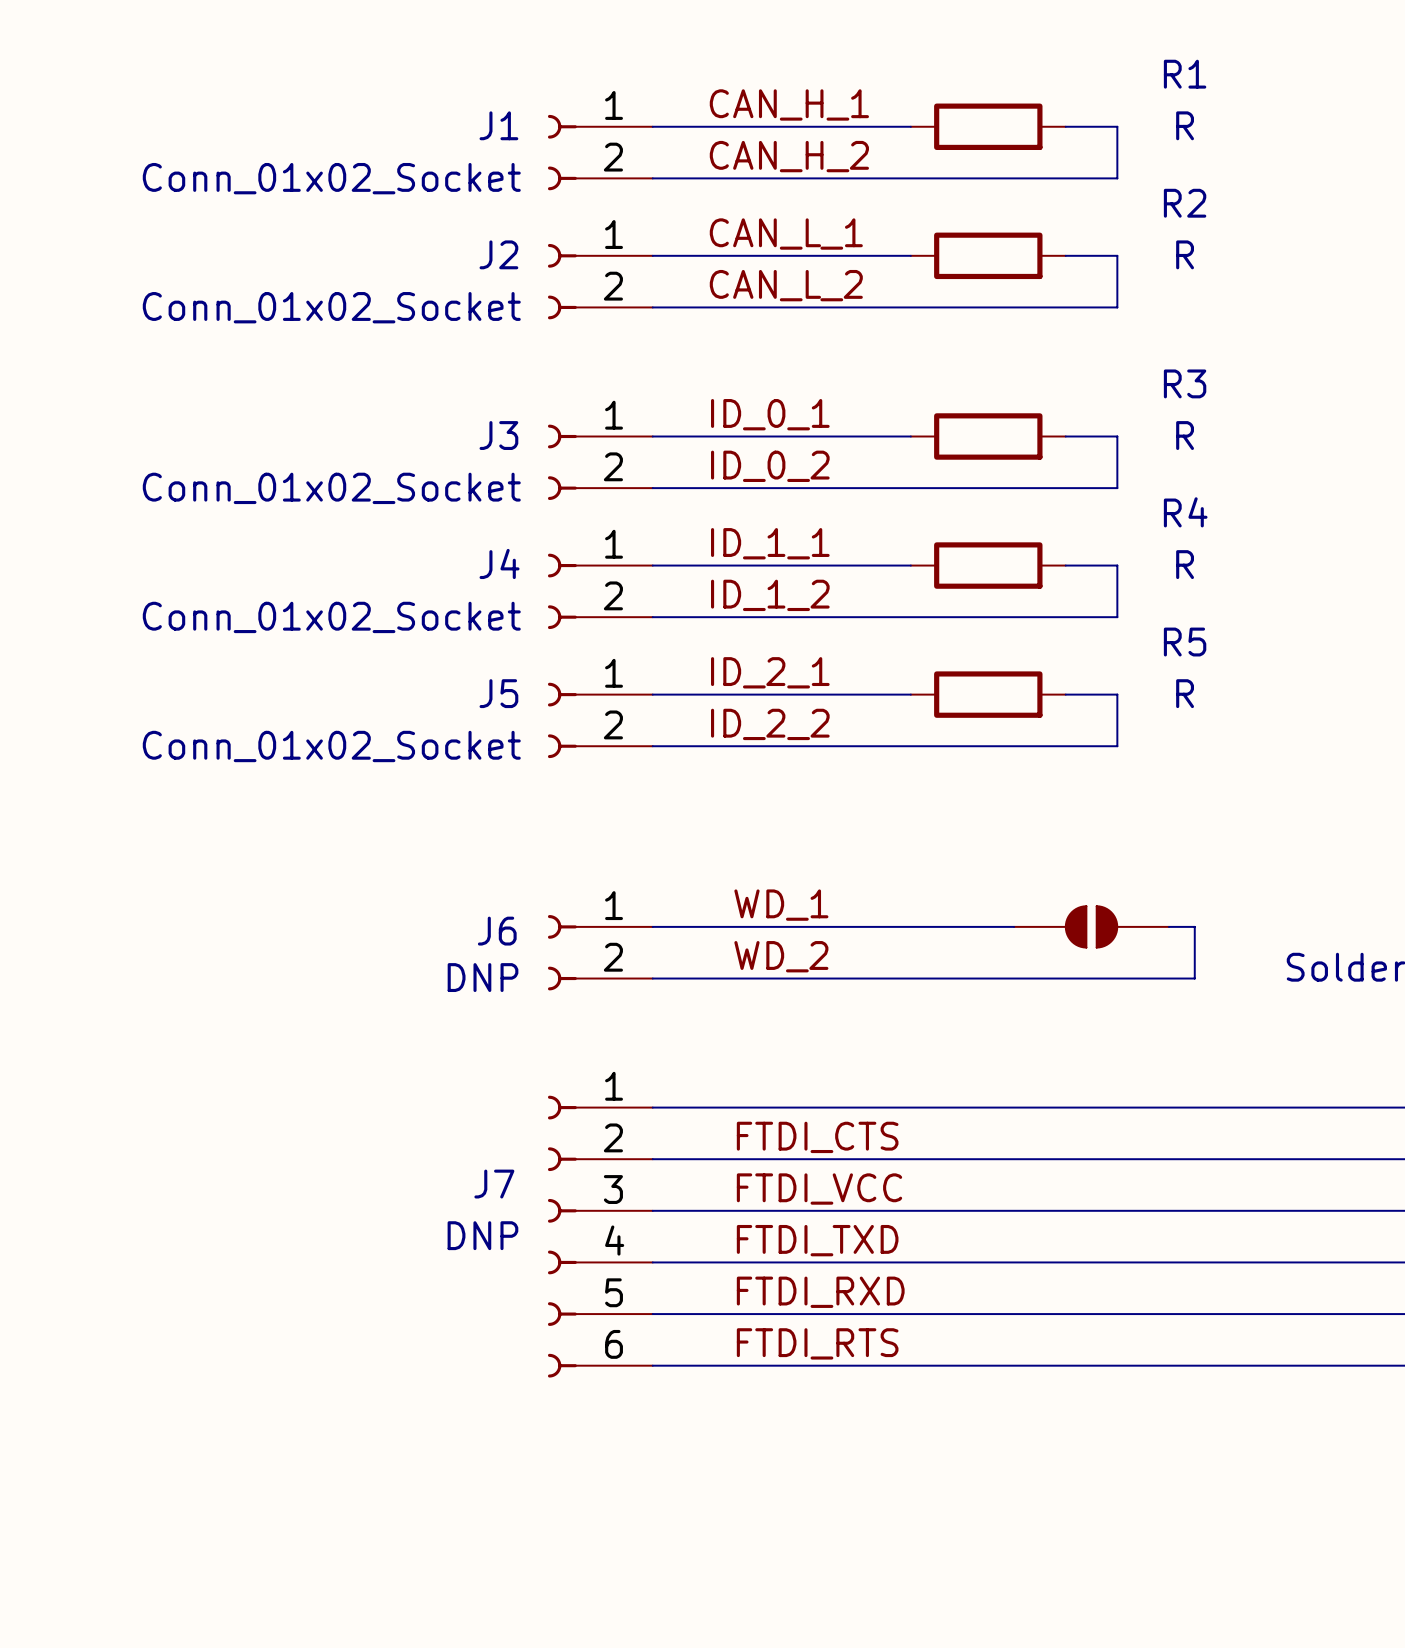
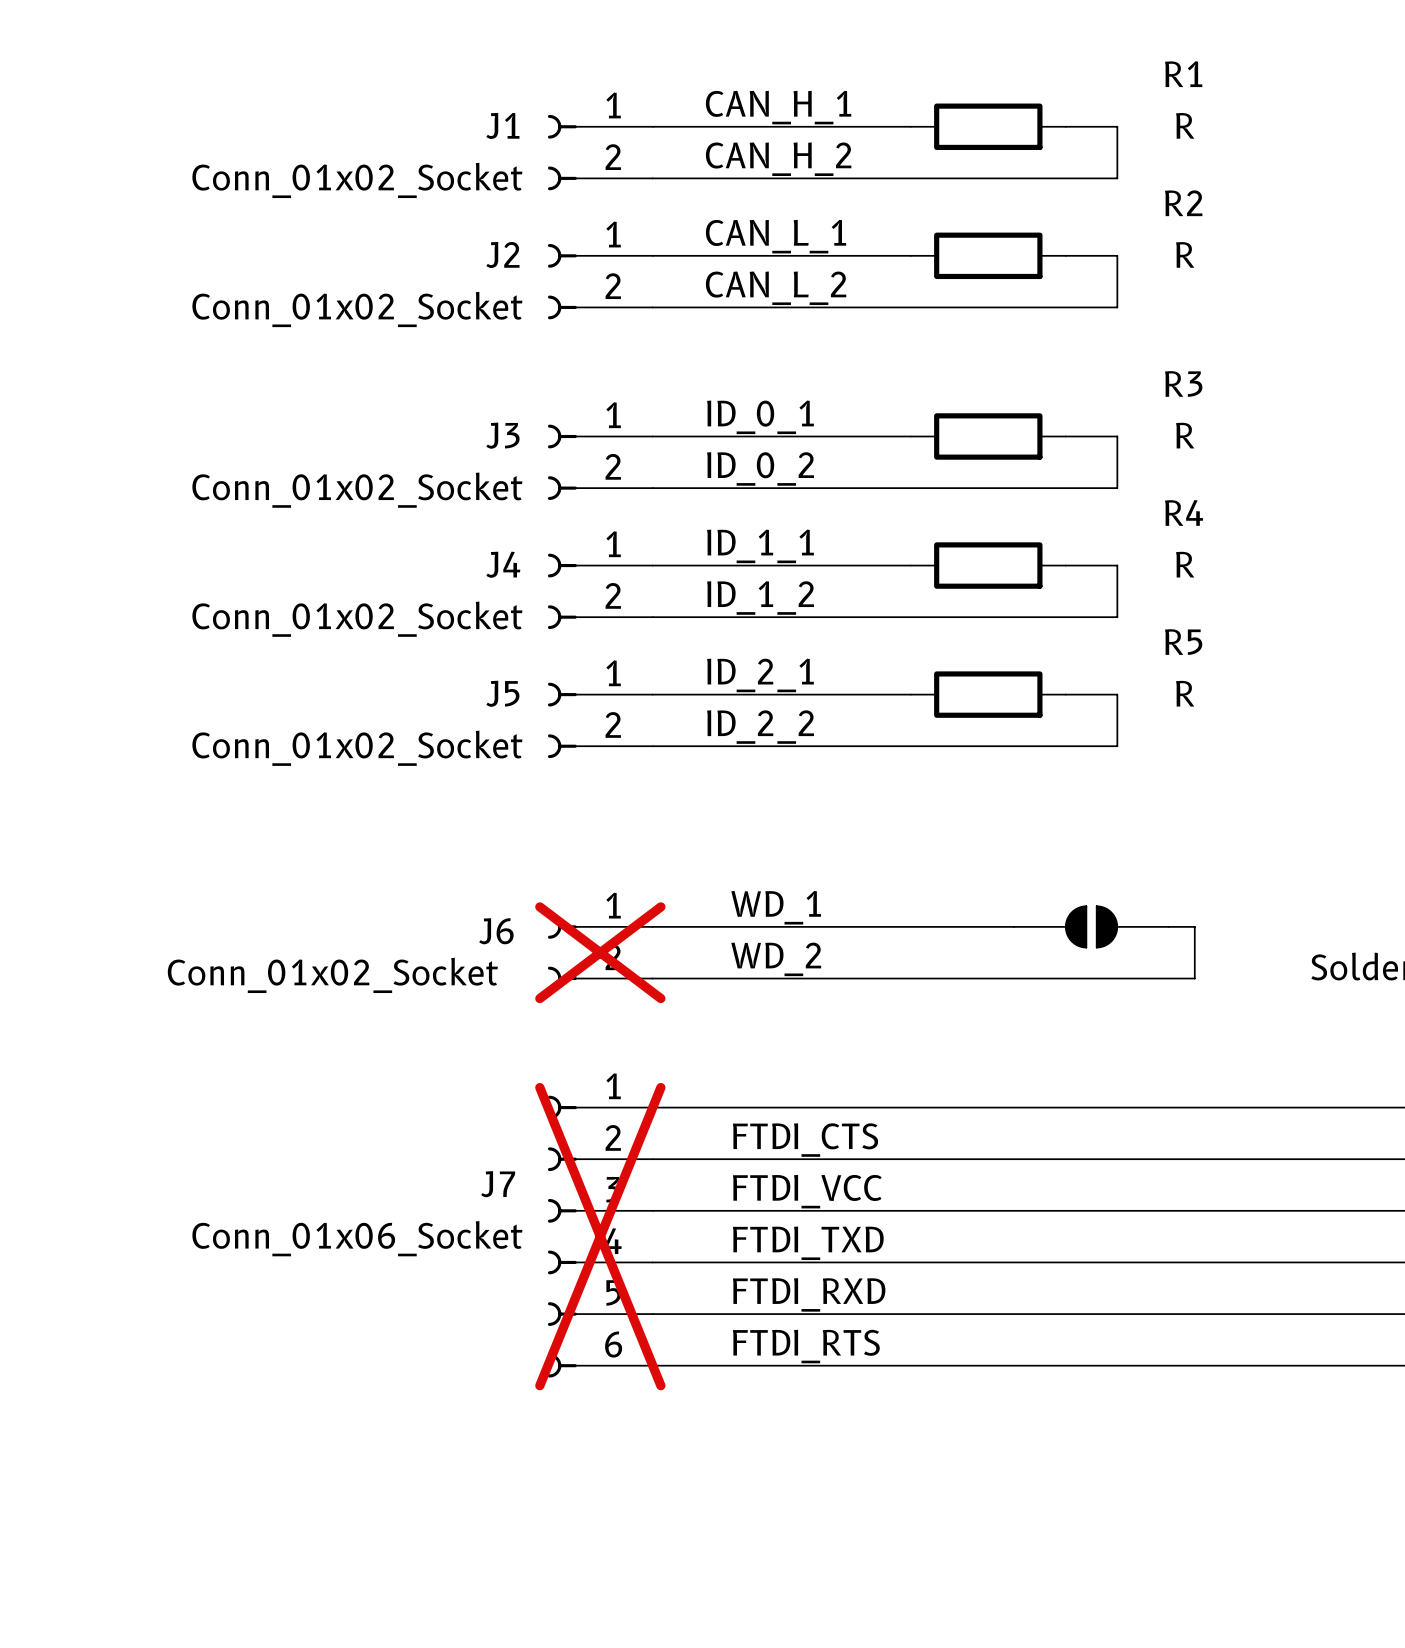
J6 do-not-place cross: none -> (600, 952)
J6 value: DNP (483, 977) -> Conn_01x02_Socket (332, 975)
J7 value: DNP (482, 1235) -> Conn_01x06_Socket (357, 1238)
J7 do-not-place cross: none -> (600, 1236)

